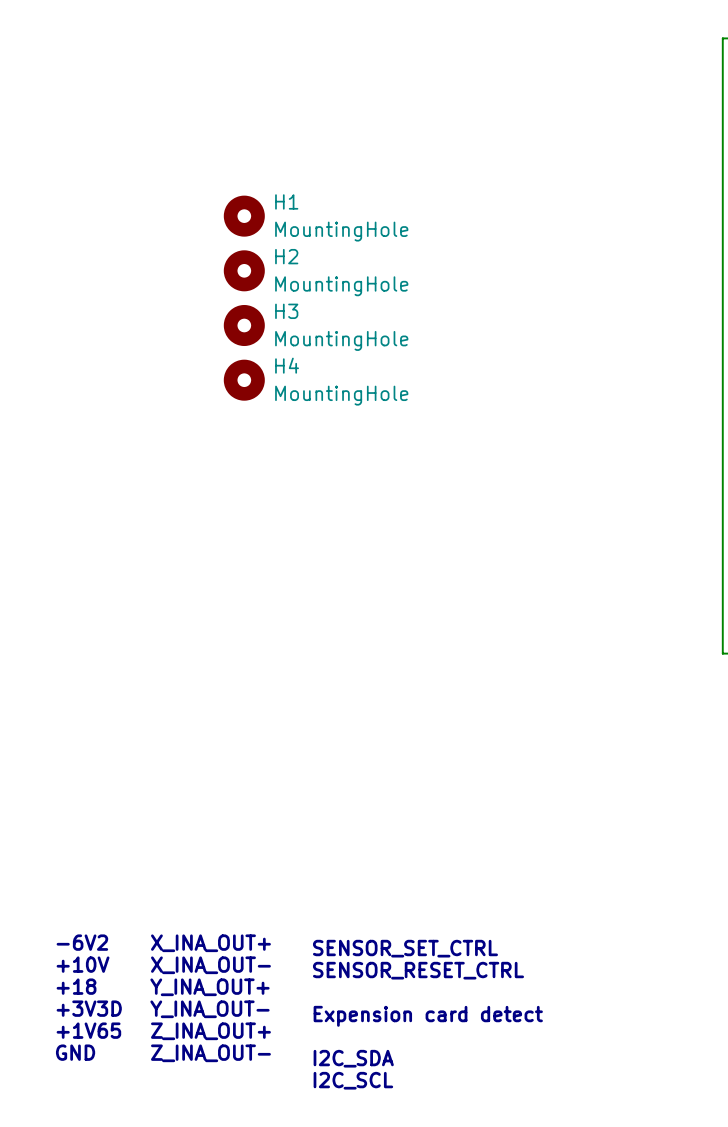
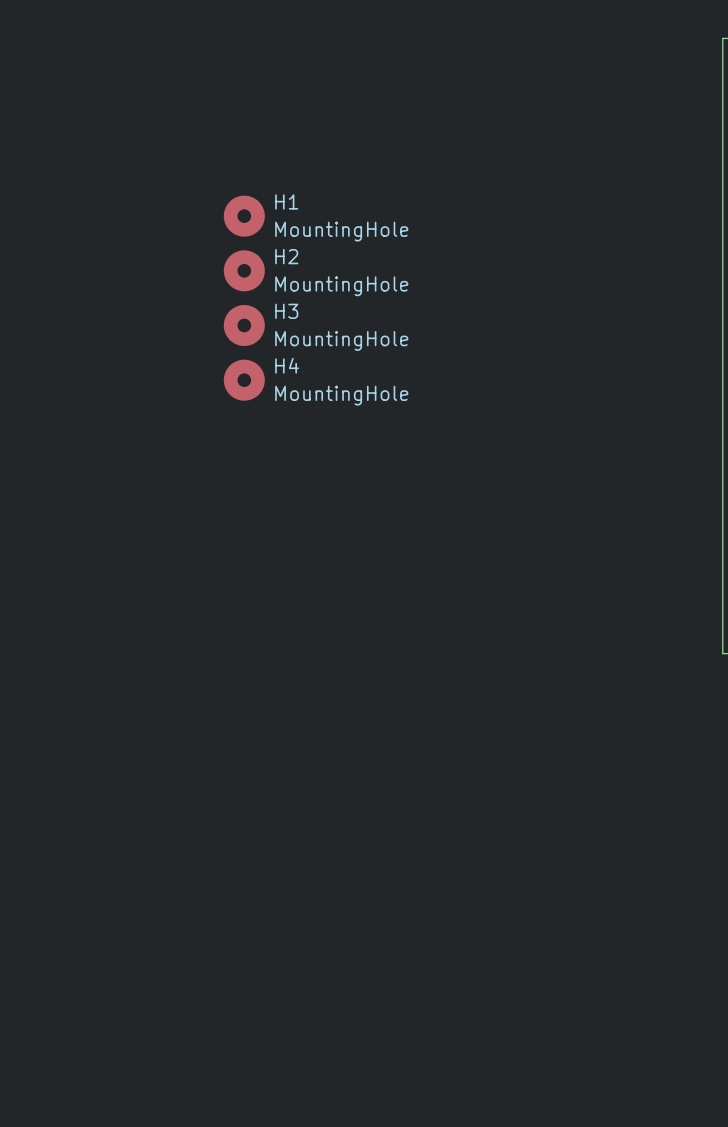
text: -6V2 (82, 942) -> none
text: X_INA_OUT+ (210, 943) -> none
text: SENSOR_SET_CTRL (405, 948) -> none
text: +10V (83, 964) -> none
text: X_INA_OUT- (210, 965) -> none
text: SENSOR_RESET_CTRL (418, 970) -> none
text: +18 (76, 986) -> none
text: Y_INA_OUT+ (209, 987) -> none
text: +3V3D (89, 1008) -> none
text: Y_INA_OUT- (209, 1009) -> none
text: Expension card detect (428, 1016) -> none
text: +1V65 (88, 1030) -> none
text: Z_INA_OUT+ (210, 1031) -> none
text: GND (75, 1052) -> none
text: Z_INA_OUT- (210, 1053) -> none
text: I2C_SDA (353, 1058) -> none
text: I2C_SCL (353, 1080) -> none

